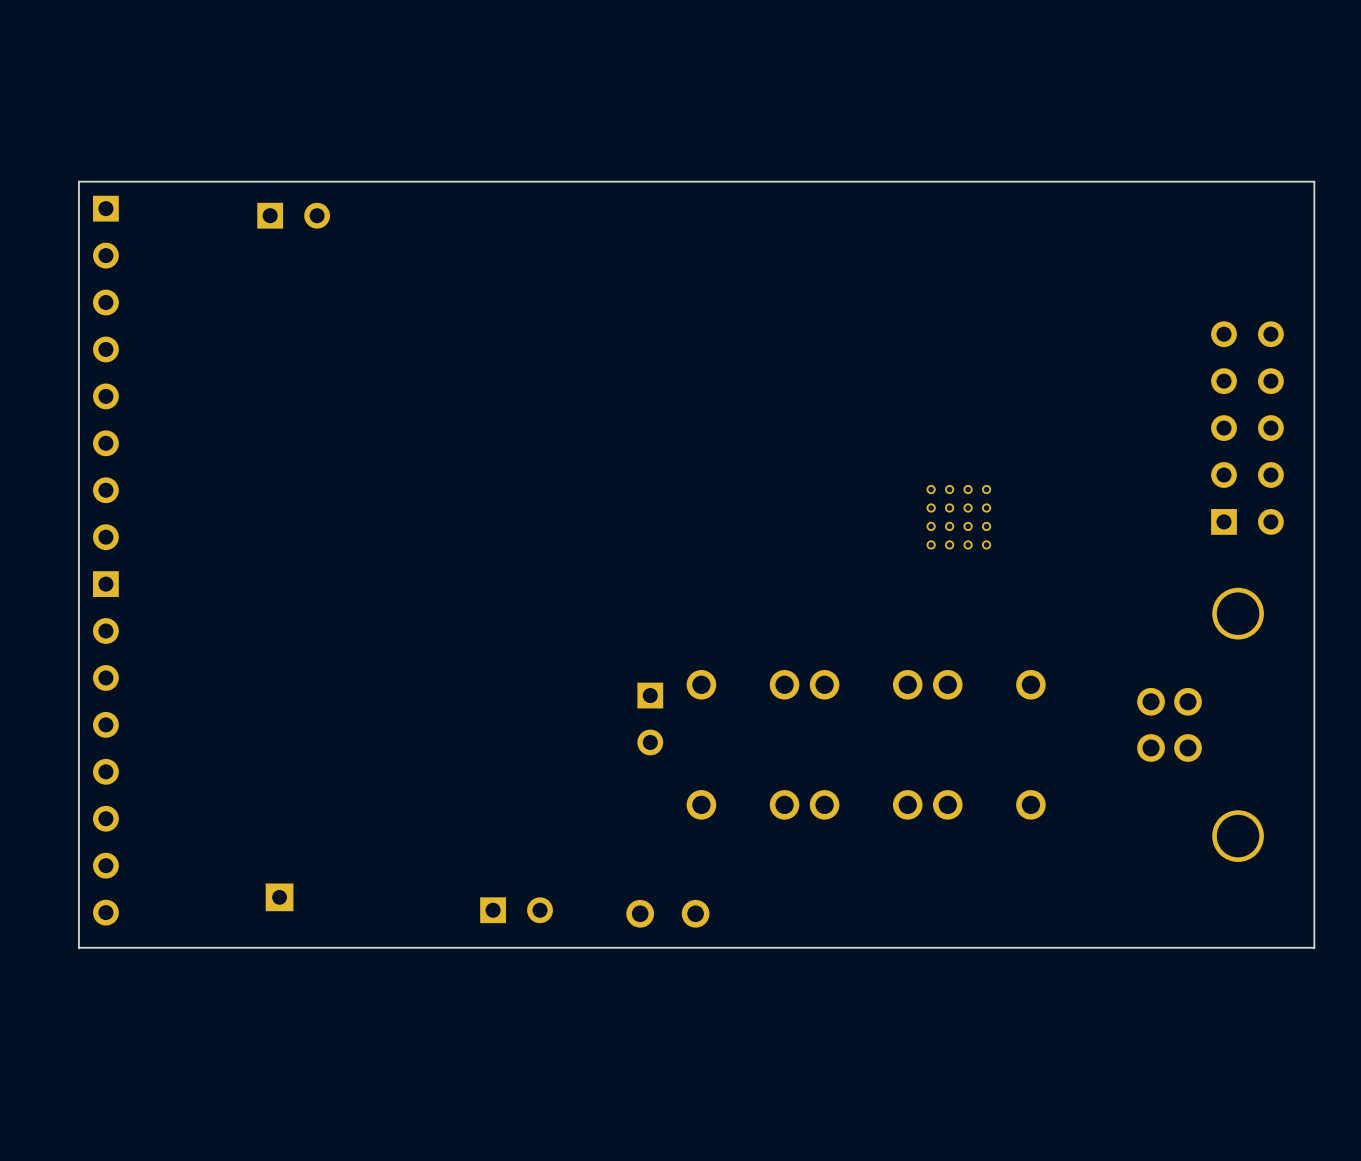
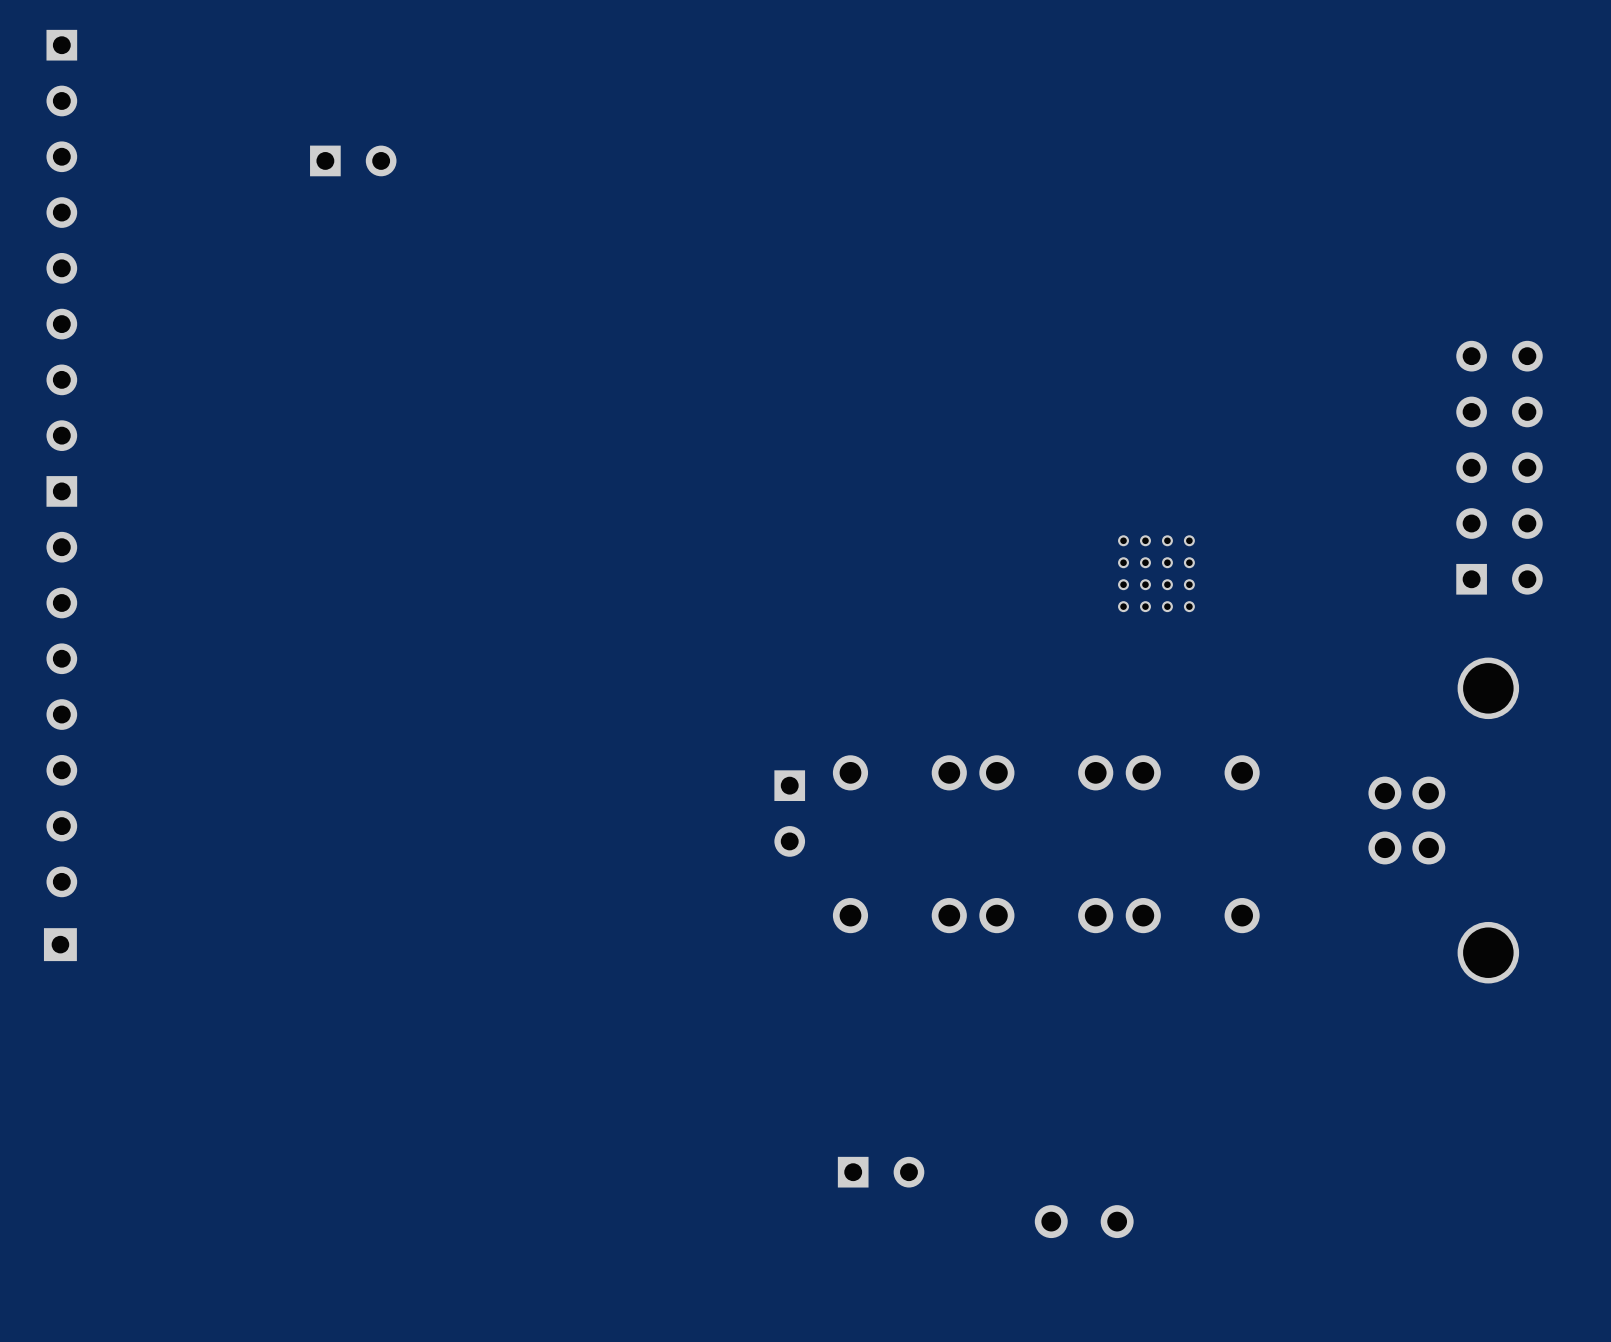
board edge: (1314, 181) (1314, 947) (78, 947) (78, 181) (1314, 181) -> none
part position: (293, 215) -> (353, 160)
part: none -> (61, 240)
part: (105, 372) -> none
part: none -> (61, 686)
part: (105, 748) -> none
part position: (279, 897) -> (60, 944)
part position: (516, 910) -> (881, 1172)
part position: (667, 913) -> (1084, 1221)

